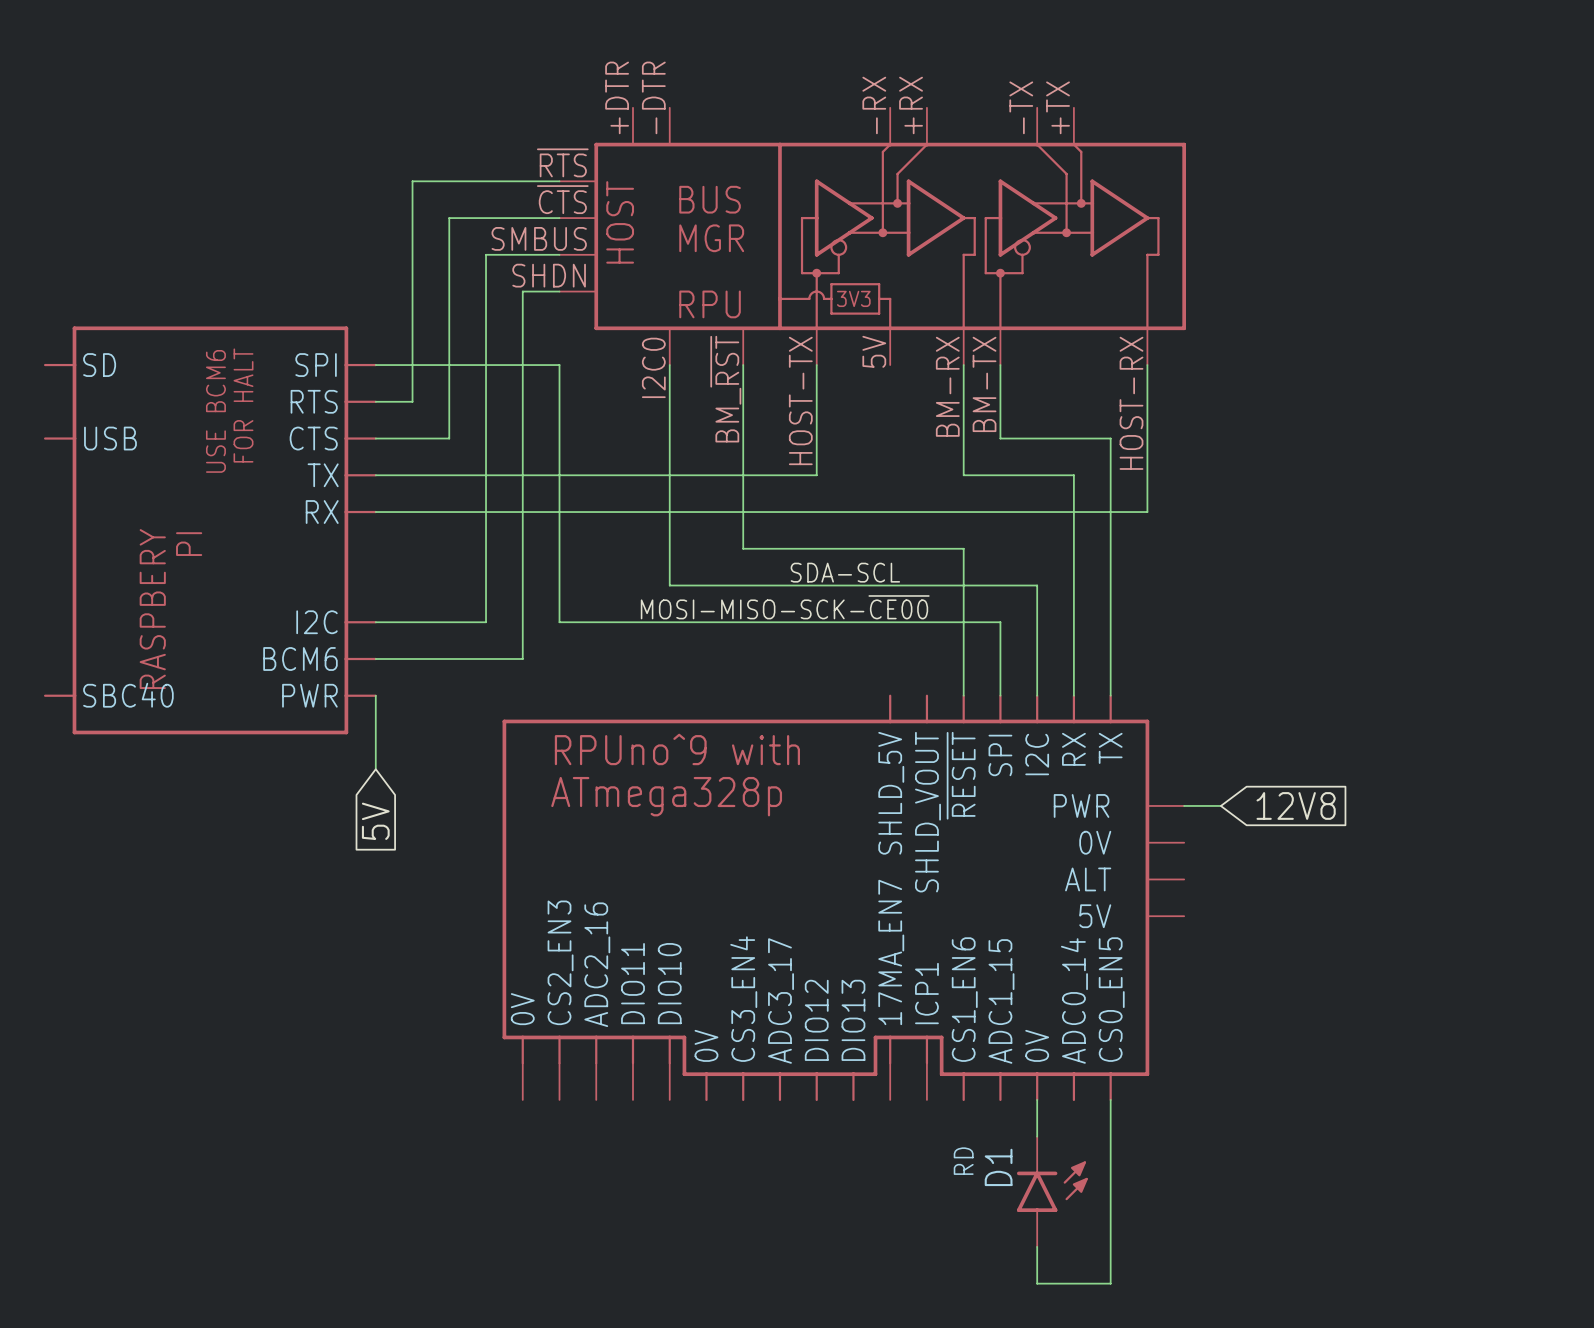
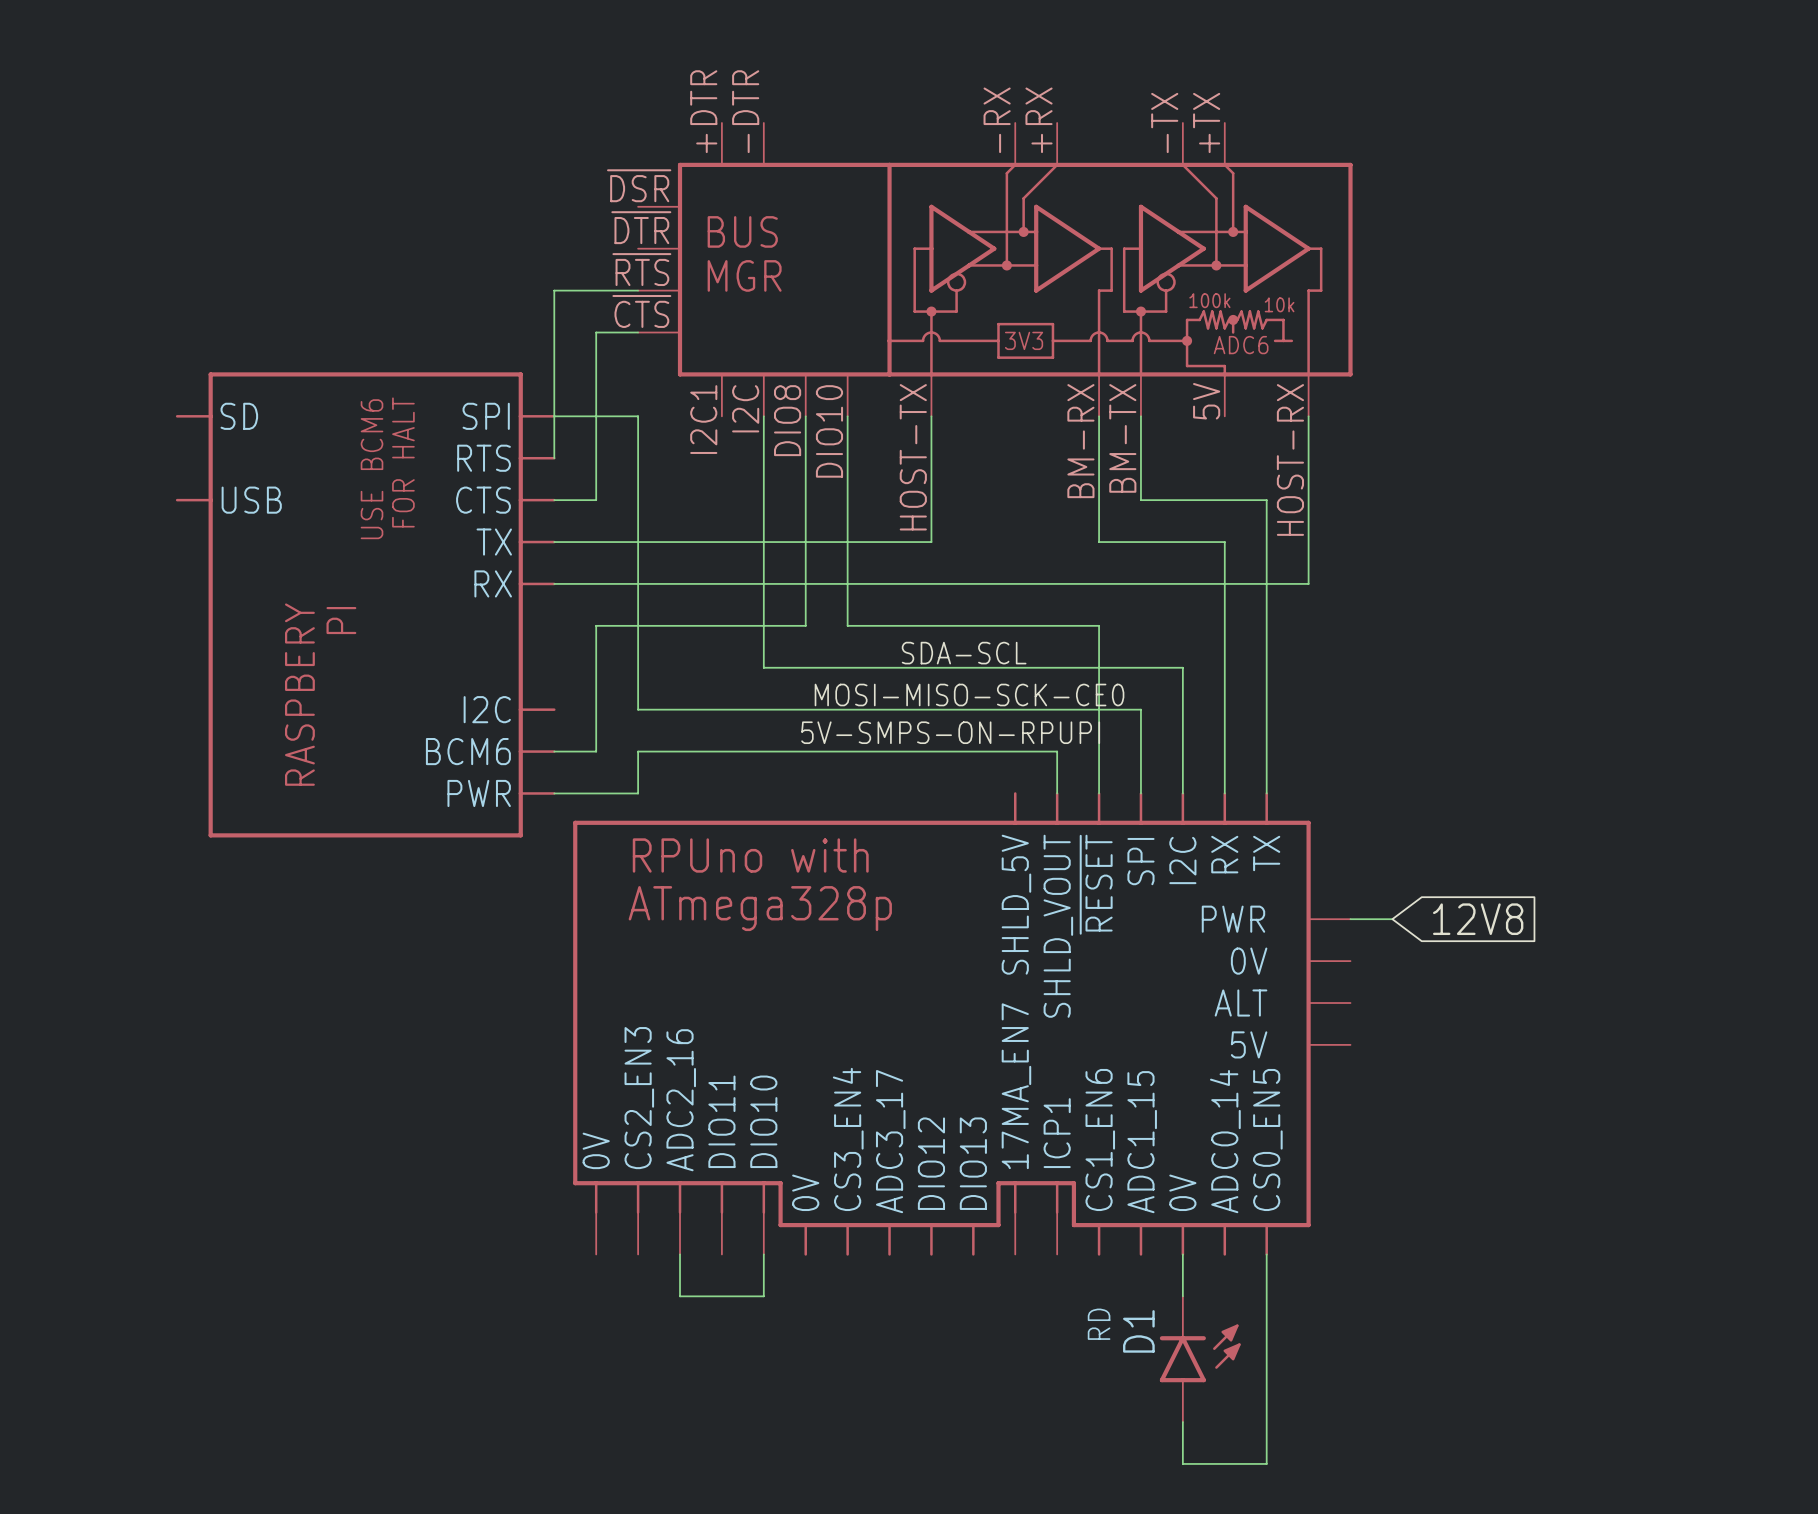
part symbol: [559, 107, 1186, 366] -> [638, 122, 1353, 417]
wire: (559, 181) (412, 181) (412, 401) (375, 401) -> none
wire: (559, 218) (449, 218) (449, 438) (375, 438) -> none
wire: (375, 365) (486, 365) -> none
wire: none -> (805, 416) (805, 625) (596, 625)
wire: (486, 401) (486, 622) (375, 622) -> none
wire: (522, 438) (522, 548) -> (596, 500) (554, 500)
wire: (375, 475) (486, 475) -> none
wire: (375, 512) (486, 512) -> none
part: (210, 530) -> none
part: none -> (365, 604)
label: MOSI-MISO-SCK-~{CE00} (785, 607) -> MOSI-MISO-SCK-CE0 (969, 694)
label: none -> 5V-SMPS-ON-RPUPI (950, 732)
wire: (375, 658) (486, 658) -> none
wire: (375, 695) (375, 769) -> none
wire: none -> (554, 793) (638, 793) (638, 751) (1057, 751) (1057, 793)
part text: RPUno^9 with (677, 749) -> RPUno with (750, 855)
global label: 5V (375, 821) -> none
wire: none -> (680, 1254) (680, 1296) (763, 1296) (763, 1254)

